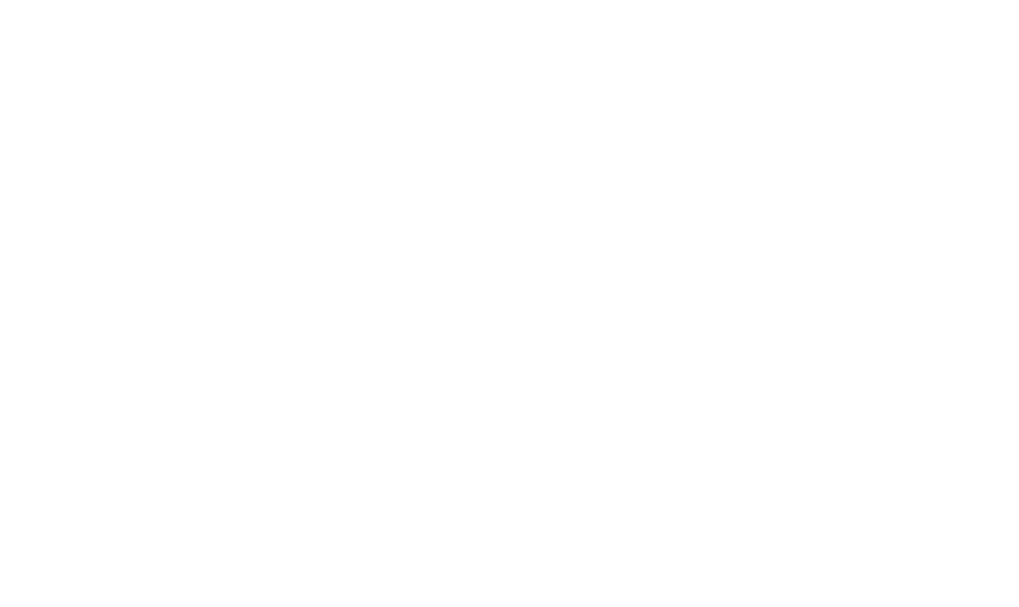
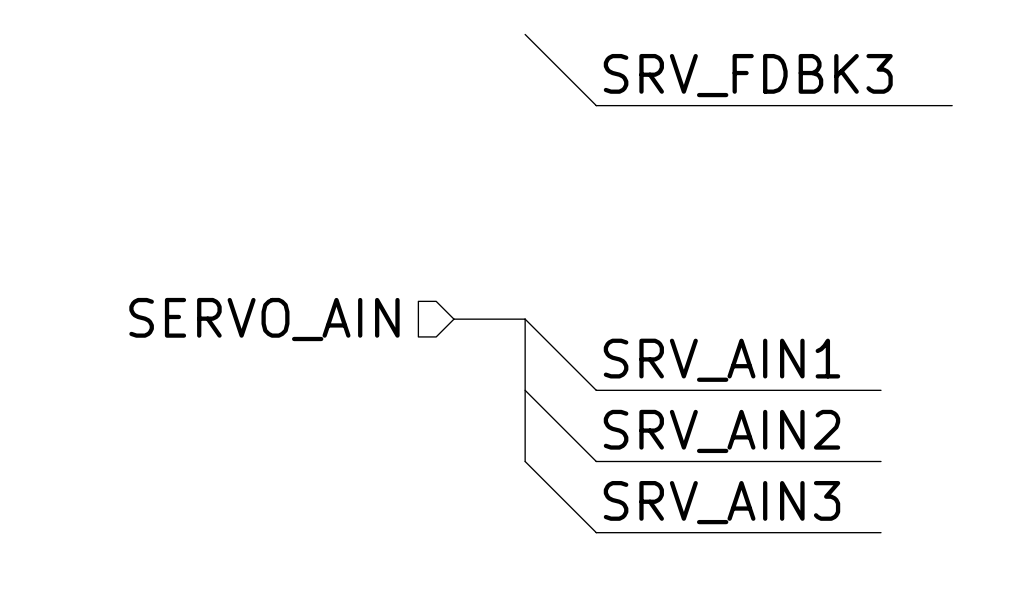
wire: none -> (525, 34) (596, 105) (952, 105)
label: none -> SRV_FDBK3 (748, 75)
hierarchical label: none -> SERVO_AIN (264, 319)
bus: none -> (453, 319) (525, 319) (525, 461)
wire: none -> (525, 319) (596, 390) (881, 390)
label: none -> SRV_AIN1 (721, 360)
wire: none -> (525, 390) (596, 461) (881, 461)
label: none -> SRV_AIN2 (721, 431)
wire: none -> (525, 461) (596, 532) (881, 532)
label: none -> SRV_AIN3 (721, 502)

